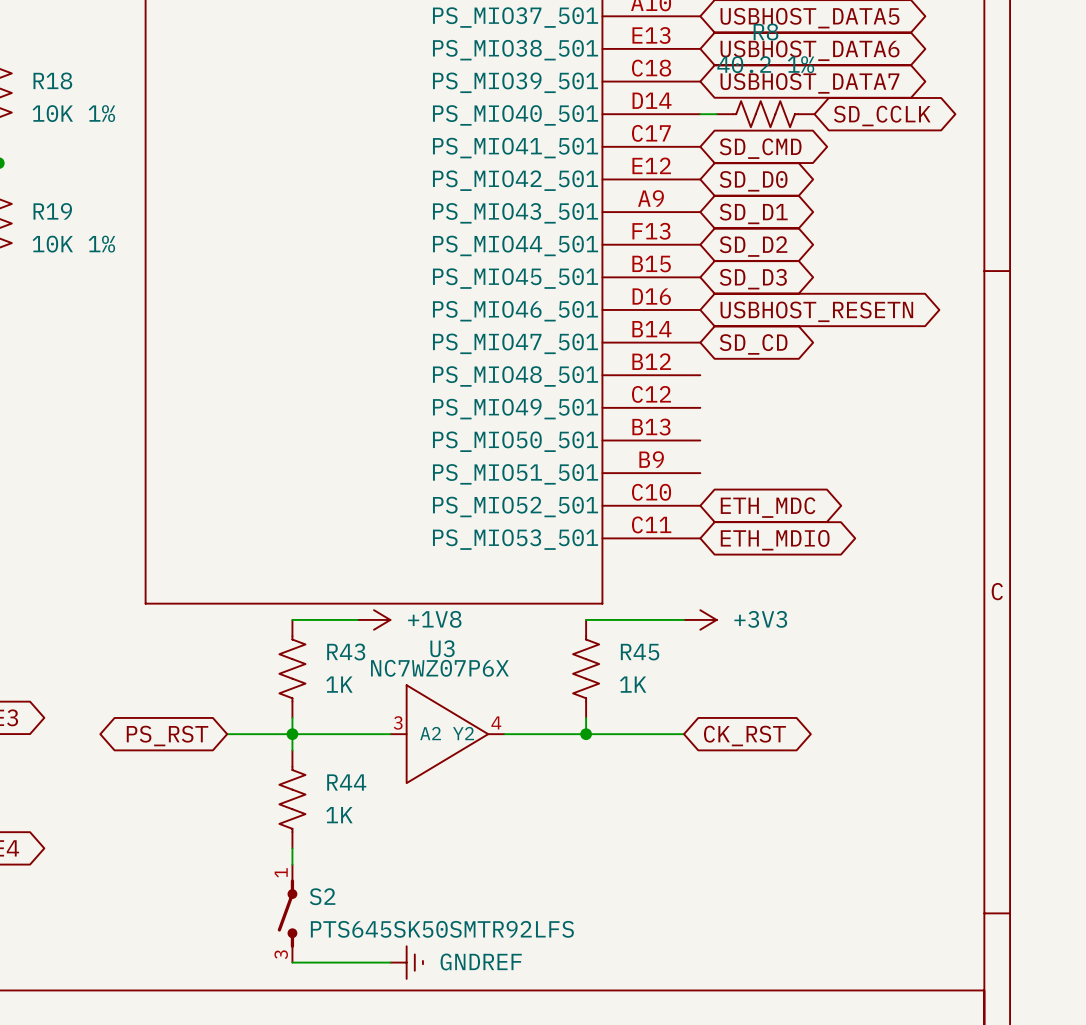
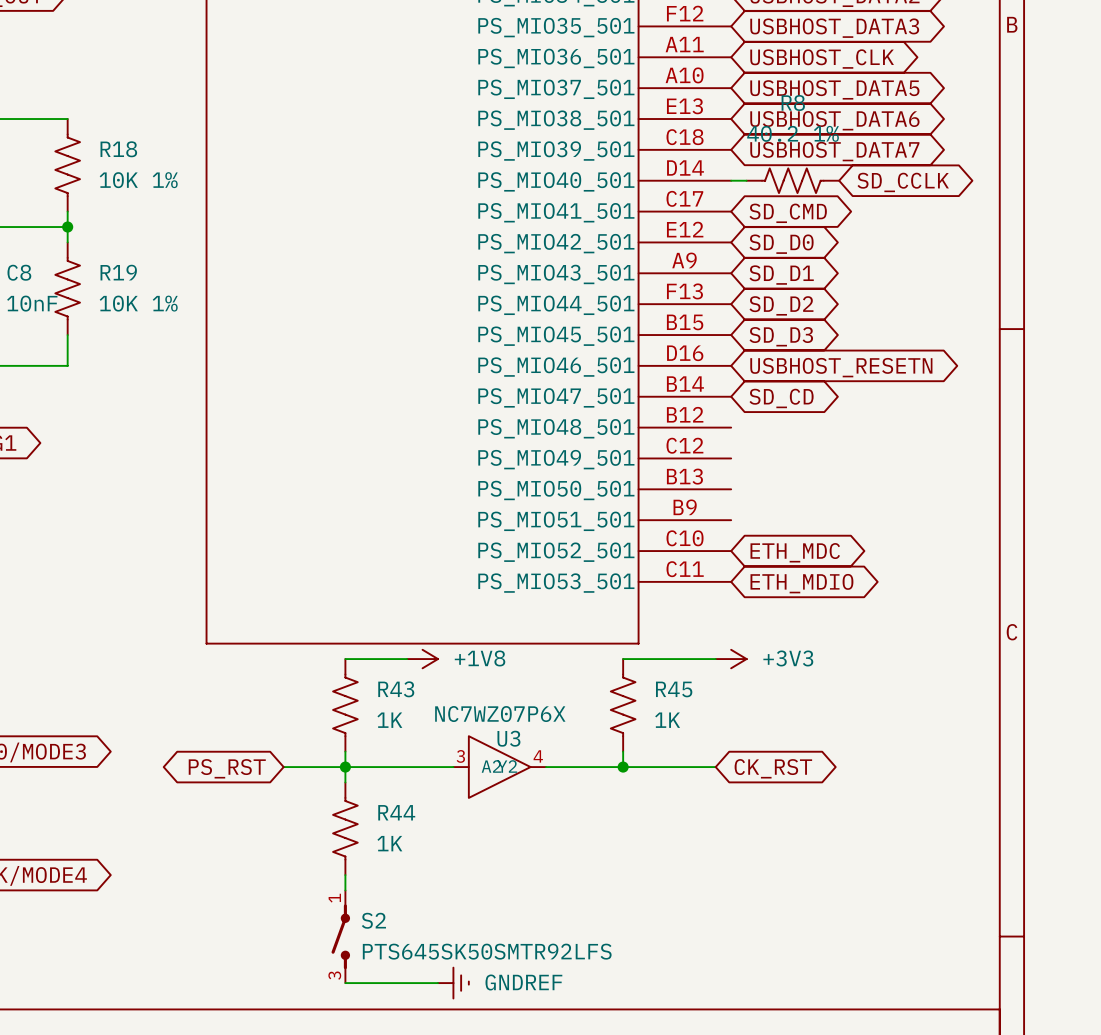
U3 name position: U3 (442, 648) -> U3 (508, 738)
U3 symbol: [390, 685, 505, 784] -> [453, 736, 546, 798]

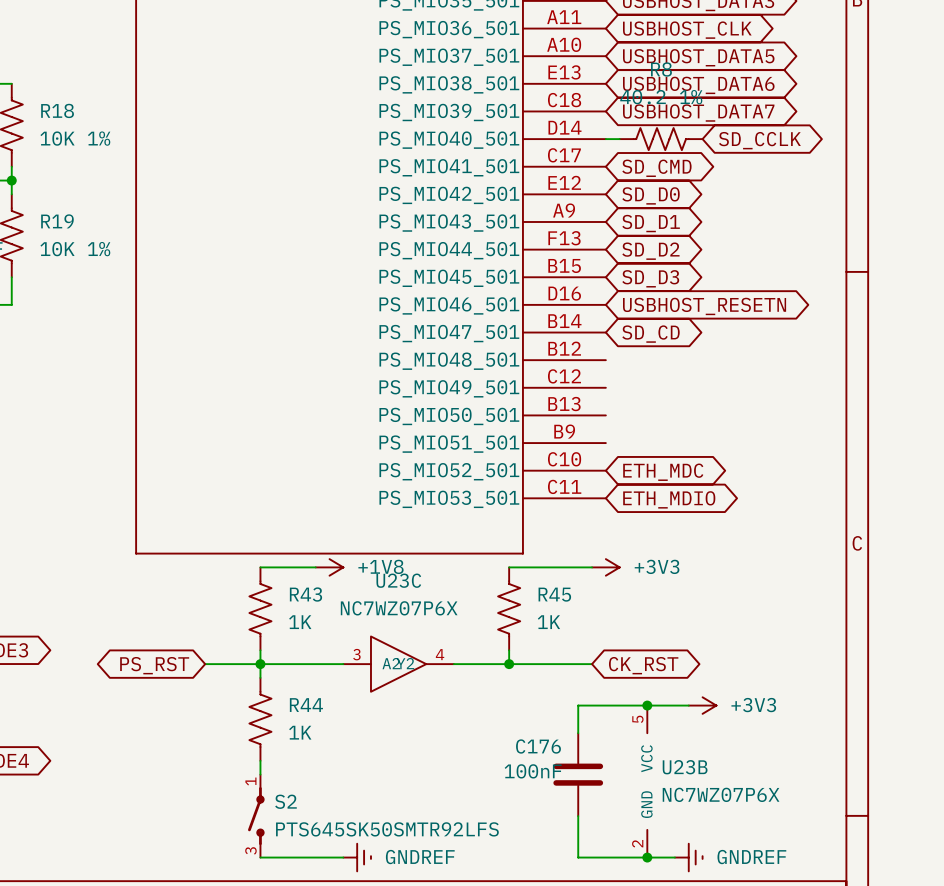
U3: NC7WZ07P6X (499, 767) -> none
U23C: none -> NC7WZ07P6X (398, 664)
junction: none -> (647, 705)
wire: none -> (688, 705) (578, 705) (578, 733)
power symbol: none -> +3V3 (702, 705)
C176: none -> 100nF (578, 774)
U23B: none -> NC7WZ07P6X (647, 781)
wire: none -> (578, 816) (578, 857) (674, 857)
junction: none -> (647, 857)
power symbol: none -> GNDREF (688, 857)

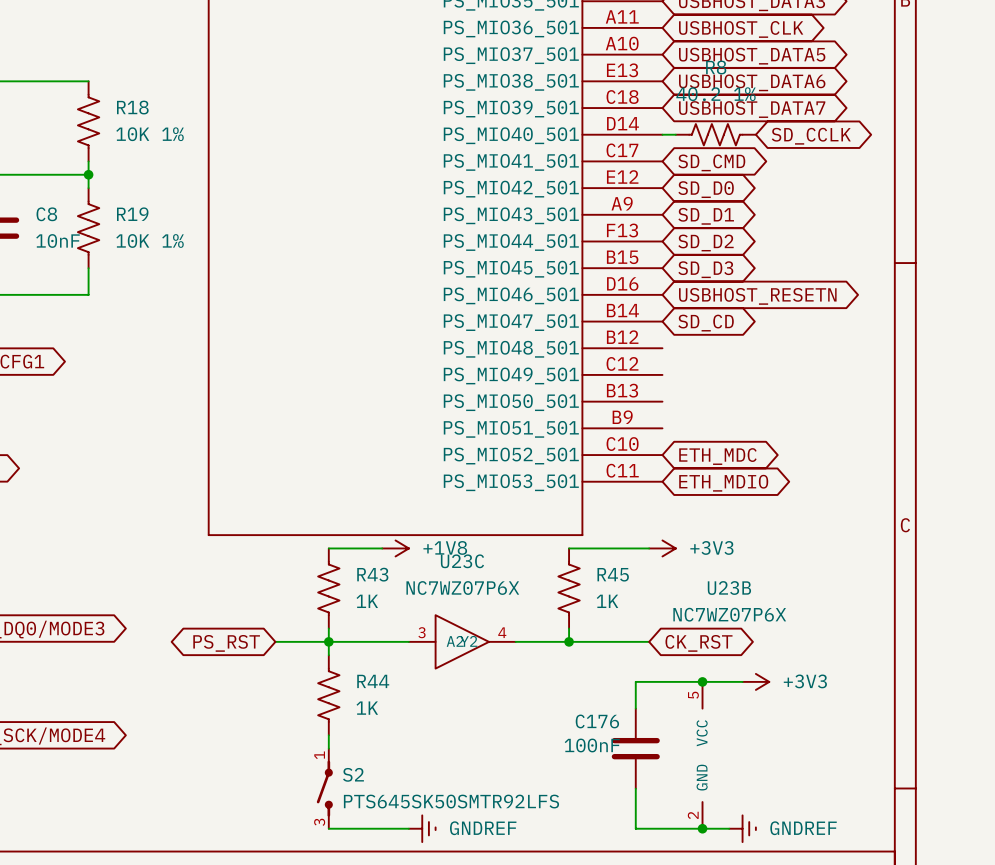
U23B name position: U23B (685, 767) -> U23B (729, 588)
U23B value position: NC7WZ07P6X (721, 794) -> NC7WZ07P6X (729, 614)

